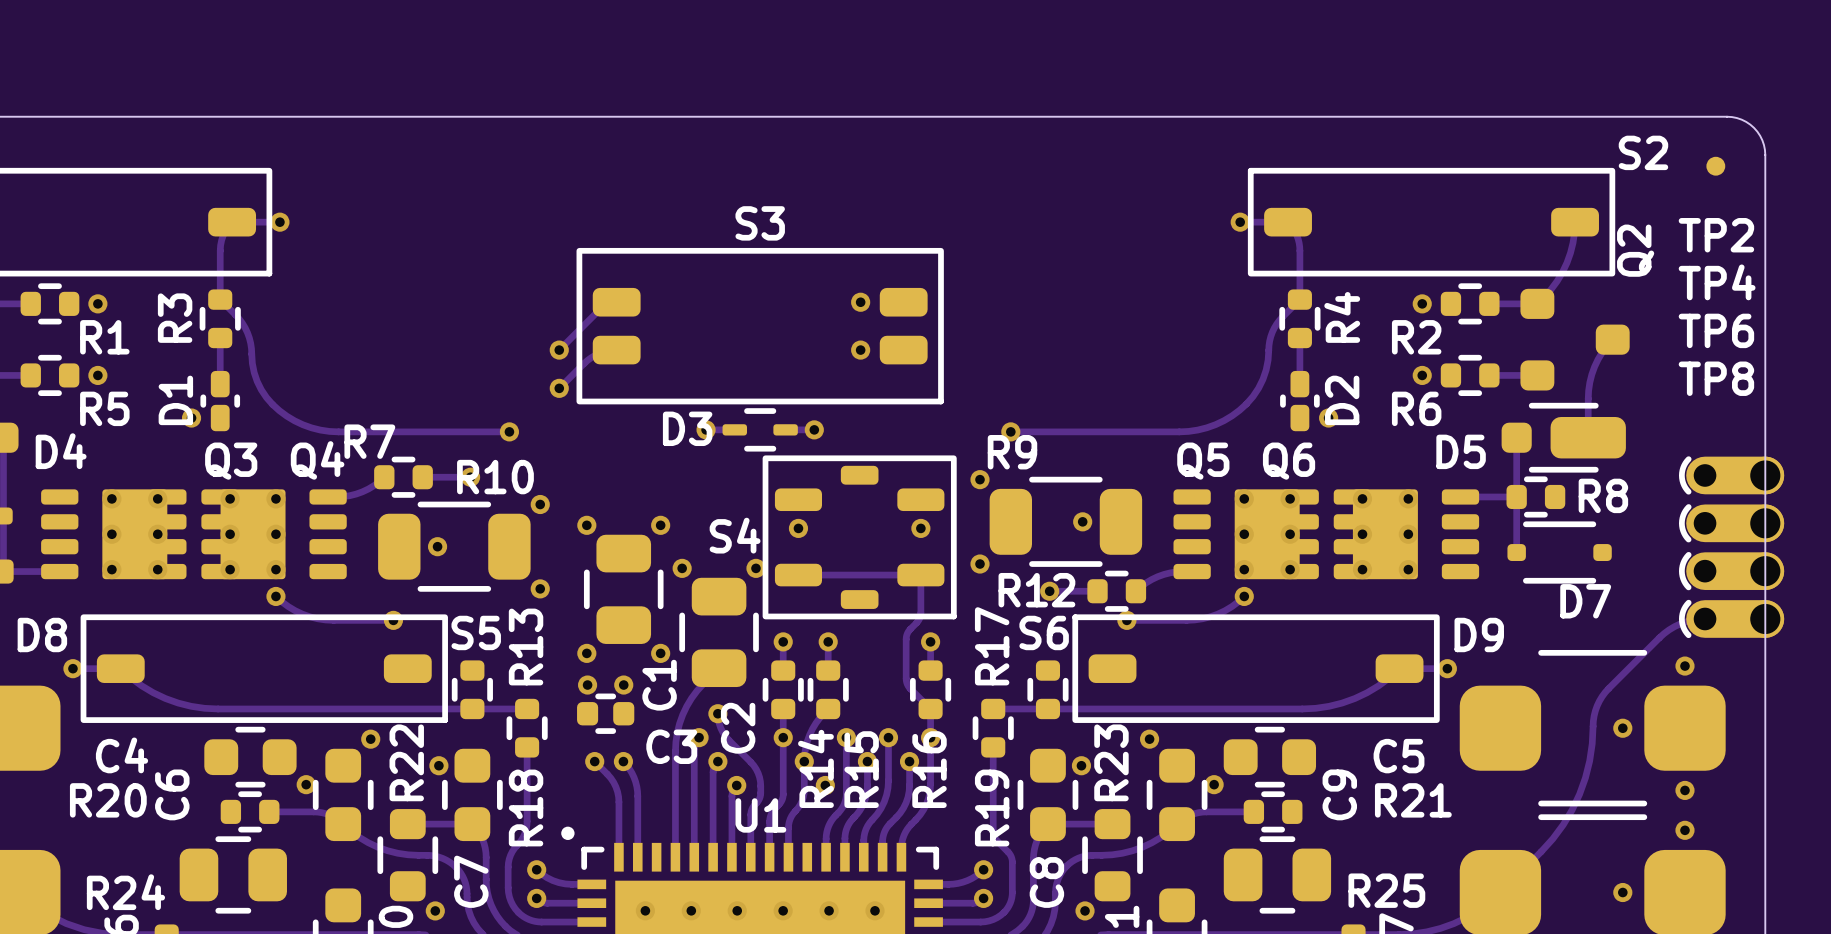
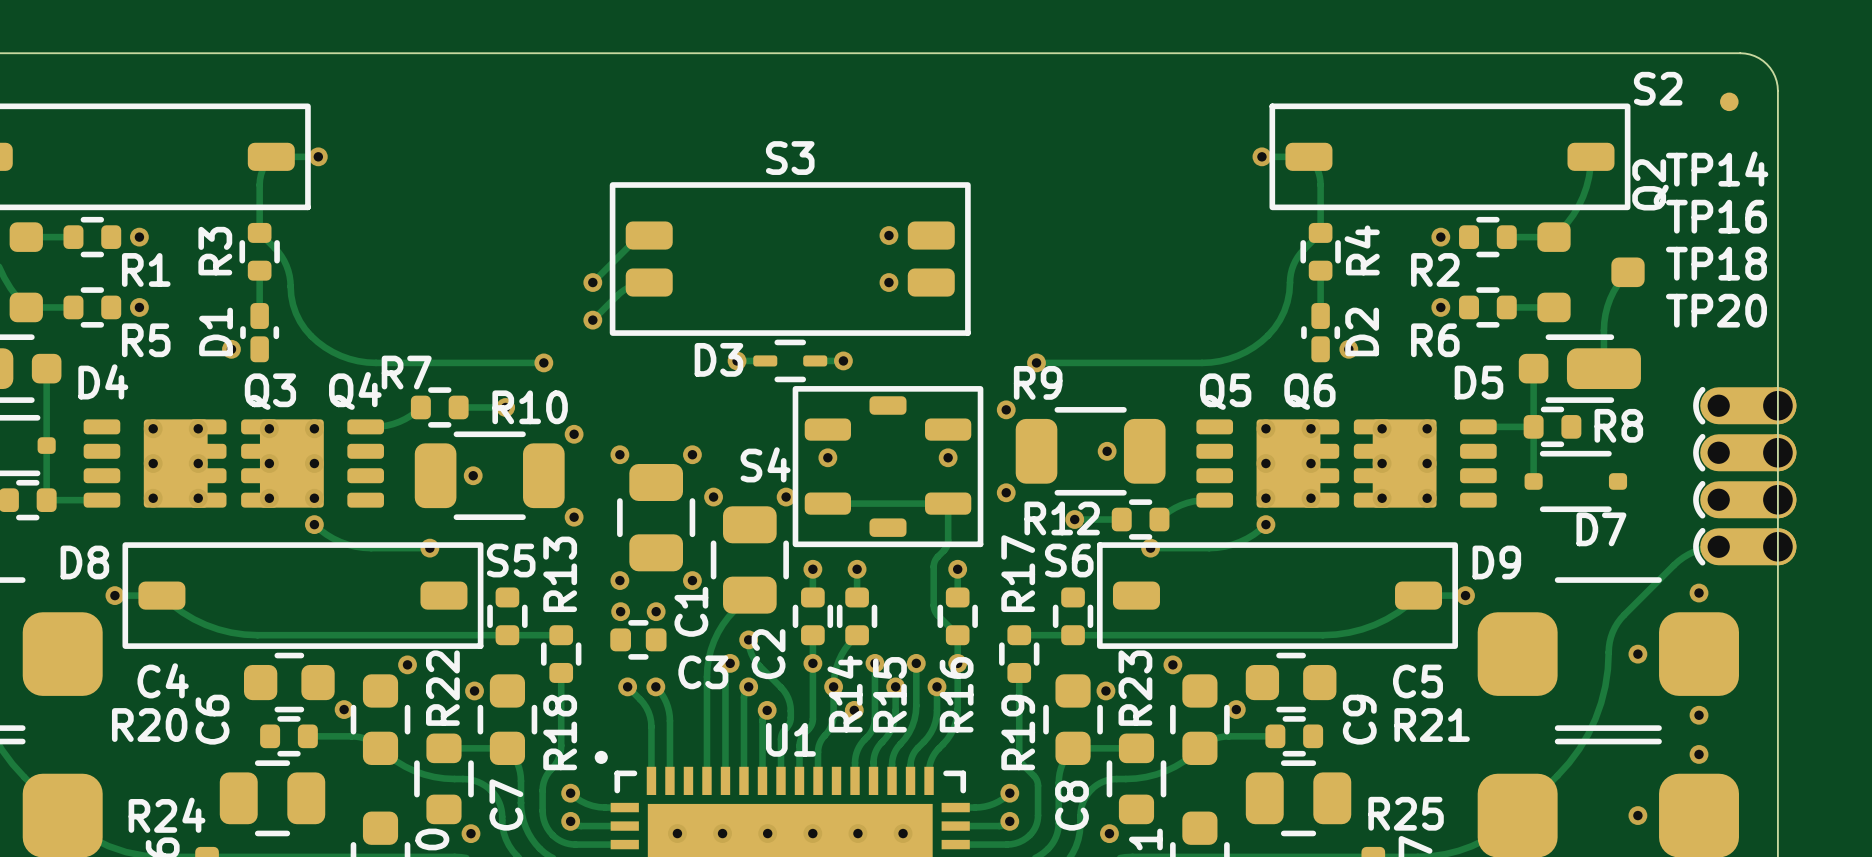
TP2 name: TP2 (1716, 235) -> TP14 (1717, 168)
TP4 name: TP4 (1717, 282) -> TP16 (1716, 216)
TP6 name: TP6 (1716, 330) -> TP18 (1716, 263)
TP8 name: TP8 (1716, 378) -> TP20 (1716, 310)

